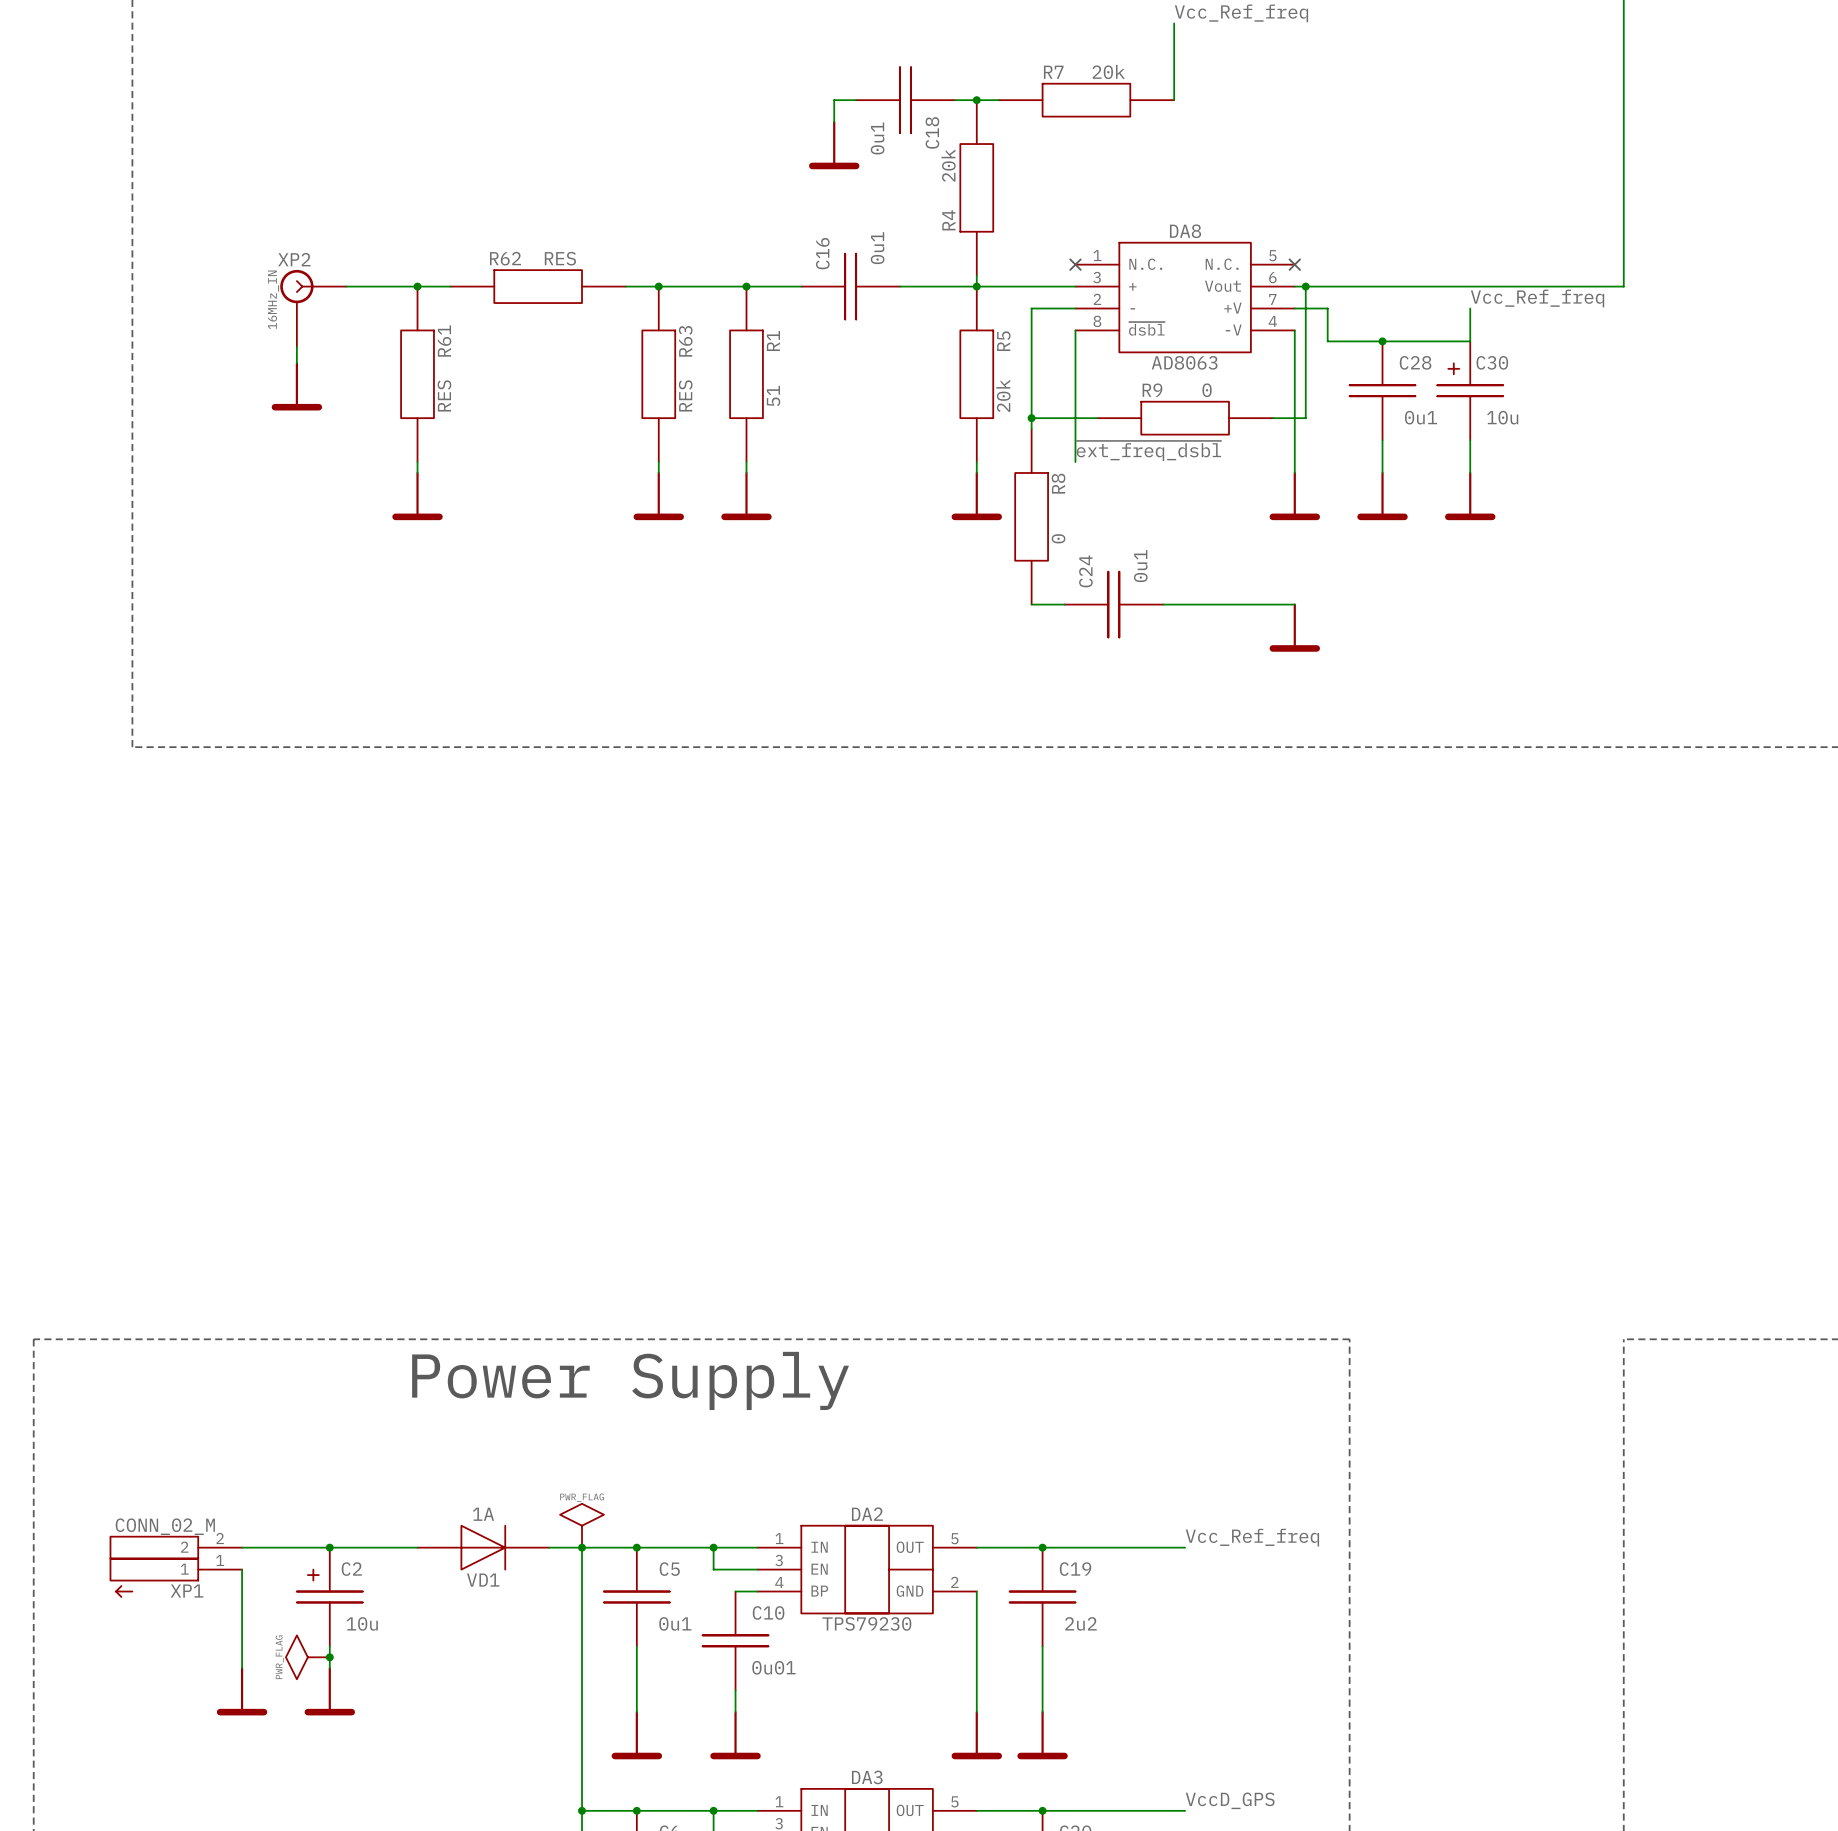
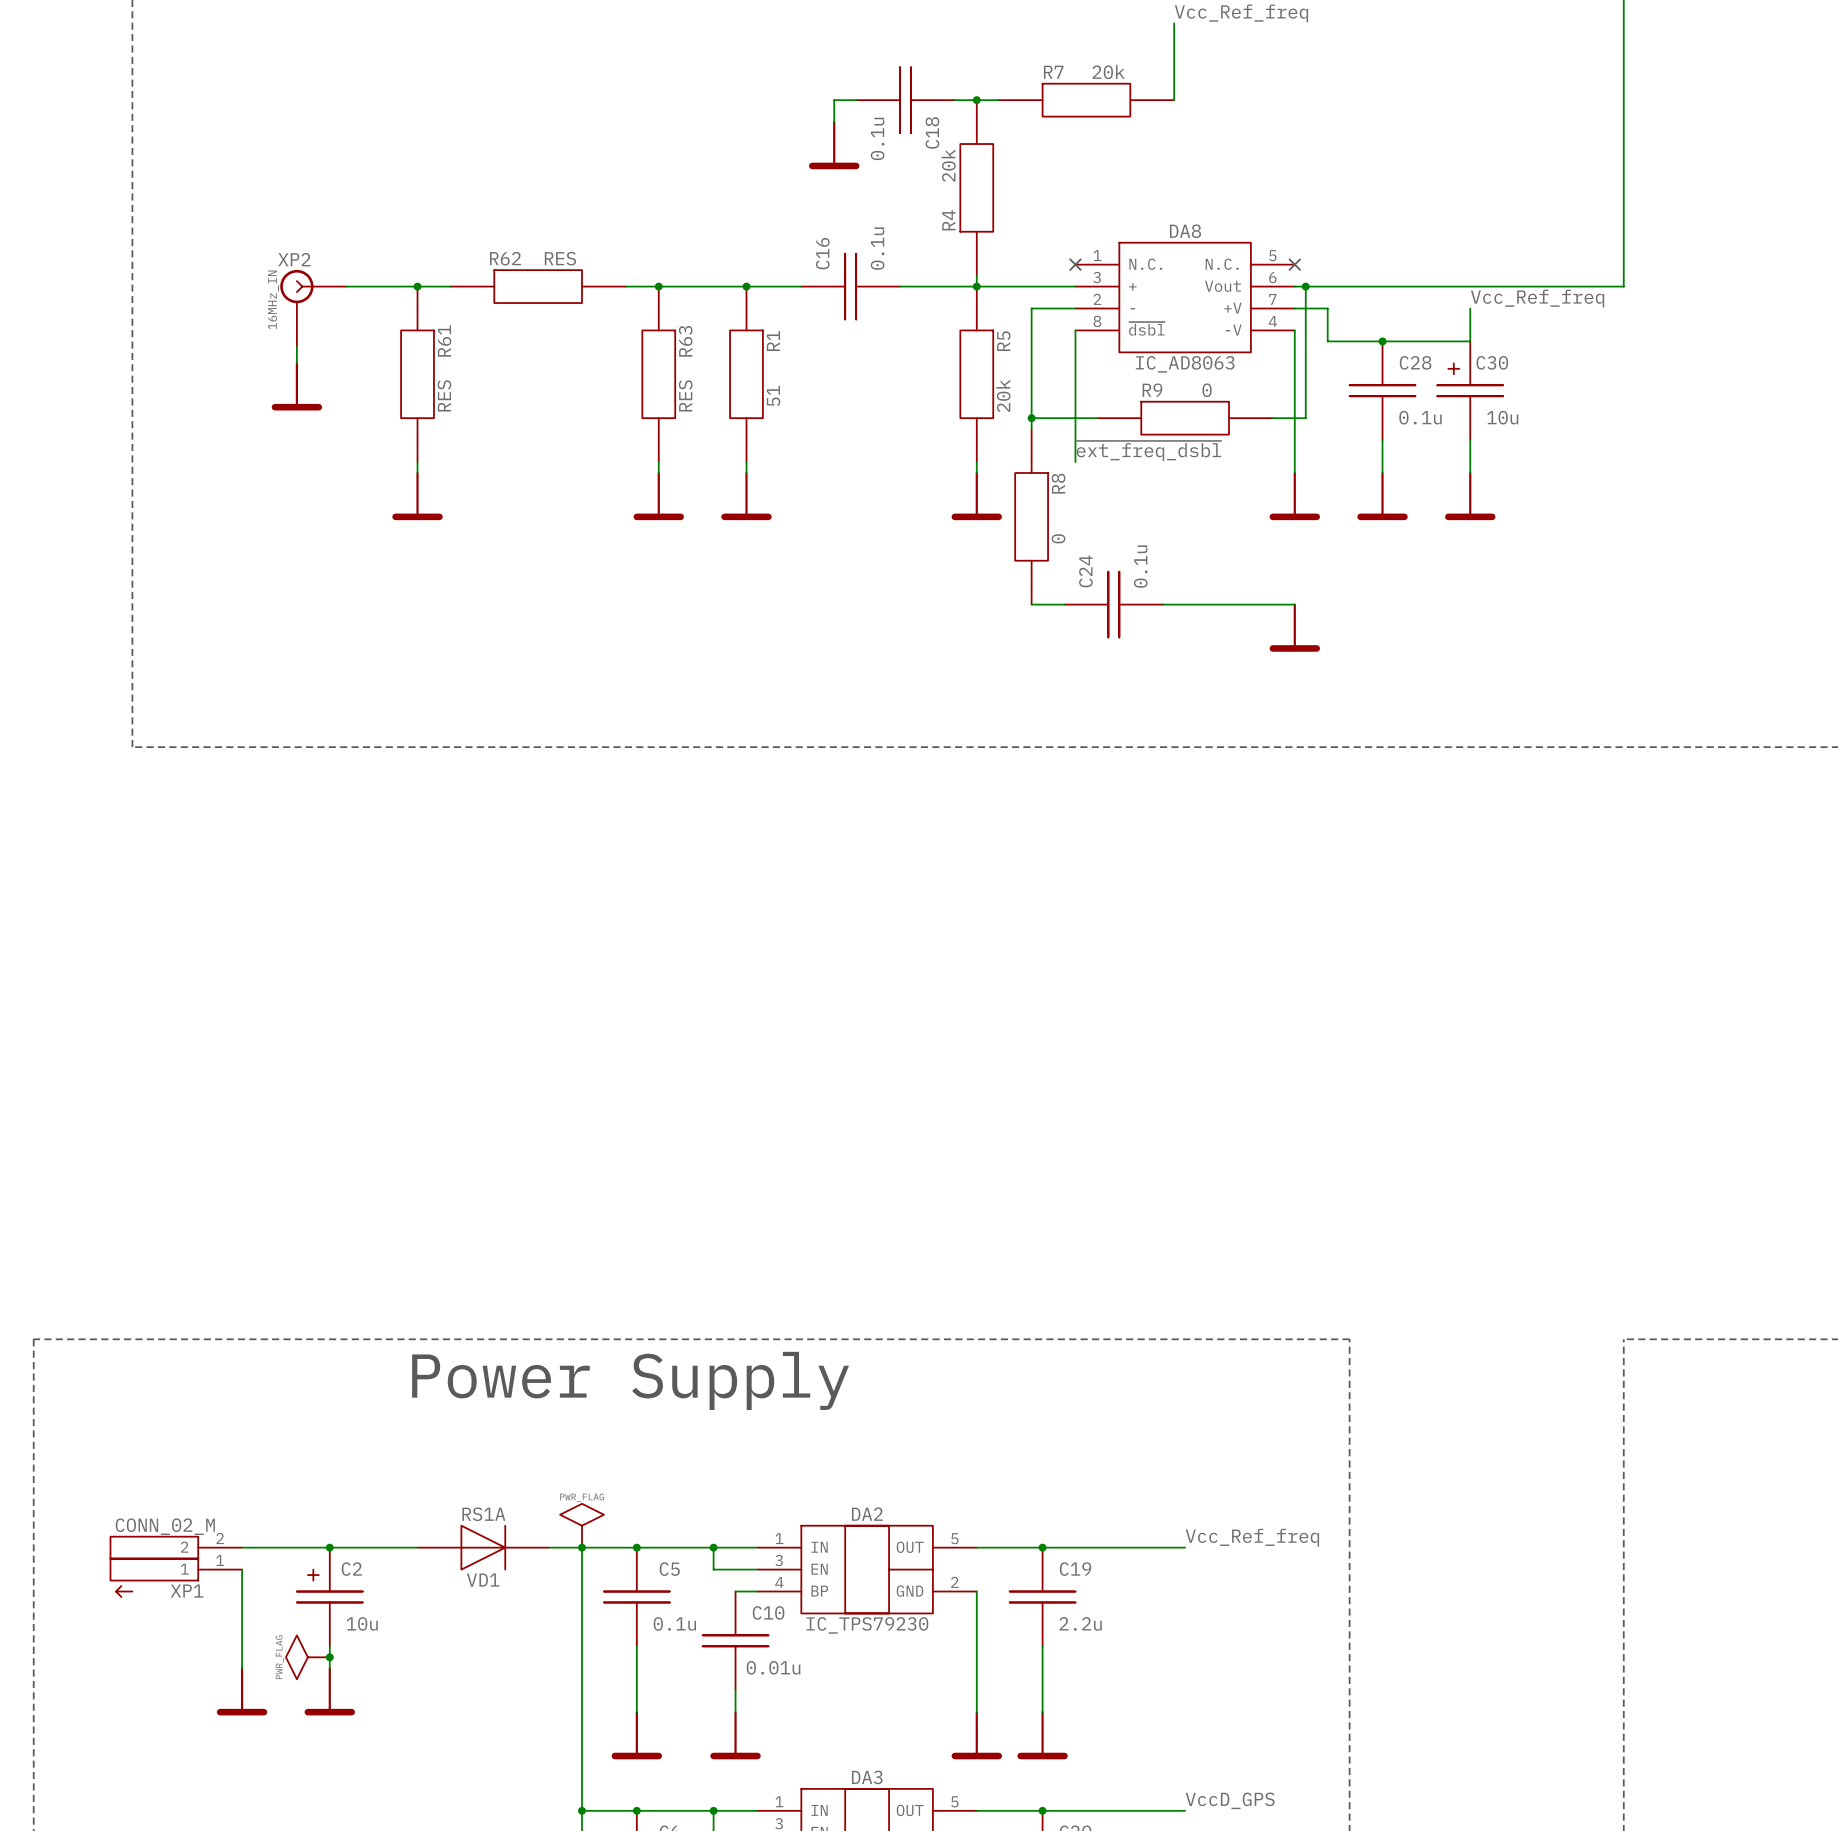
C18 value: 0u1 (877, 138) -> 0.1u (877, 138)
C16 value: 0u1 (877, 248) -> 0.1u (877, 248)
DA8 value: AD8063 (1184, 362) -> IC_AD8063 (1185, 364)
C28 value: 0u1 (1420, 417) -> 0.1u (1420, 417)
C24 value: 0u1 (1140, 566) -> 0.1u (1140, 566)
VD1 value: 1A (483, 1514) -> RS1A (483, 1514)
C5 value: 0u1 (675, 1623) -> 0.1u (674, 1623)
DA2 value: TPS79230 (866, 1623) -> IC_TPS79230 (867, 1625)
C19 value: 2u2 (1080, 1623) -> 2.2u (1080, 1623)
C10 value: 0u01 (773, 1667) -> 0.01u (773, 1667)

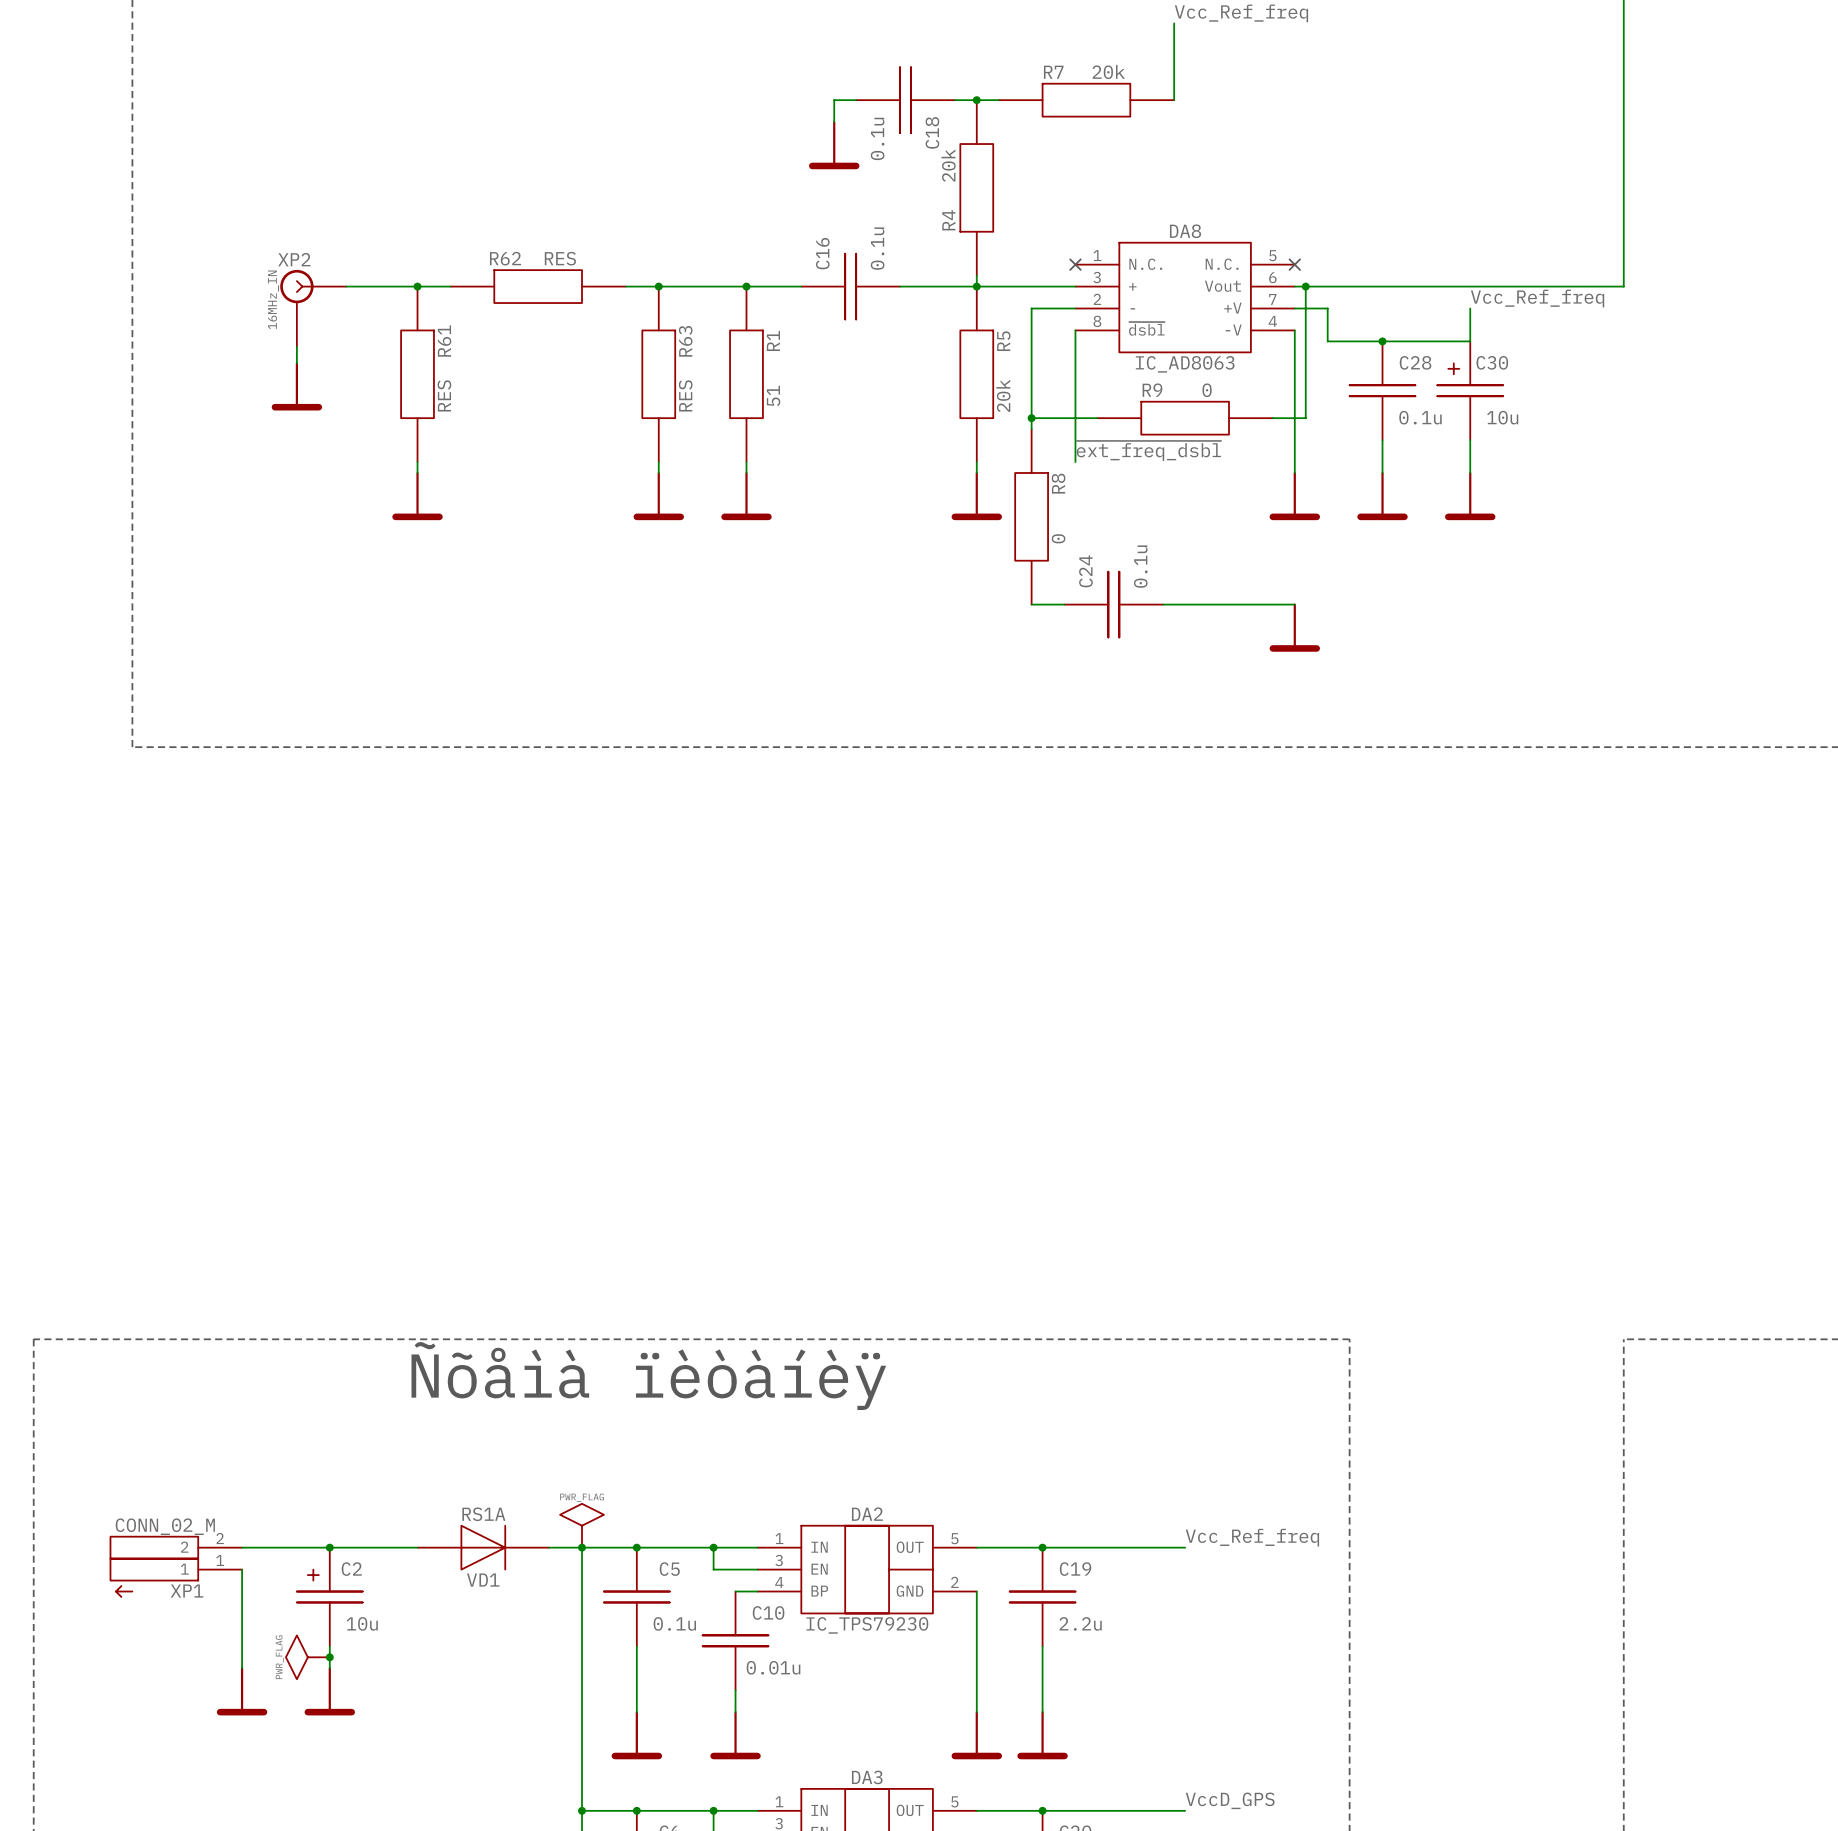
text: Power Supply (630, 1380) -> Ñõåìà ïèòàíèÿ (648, 1376)

